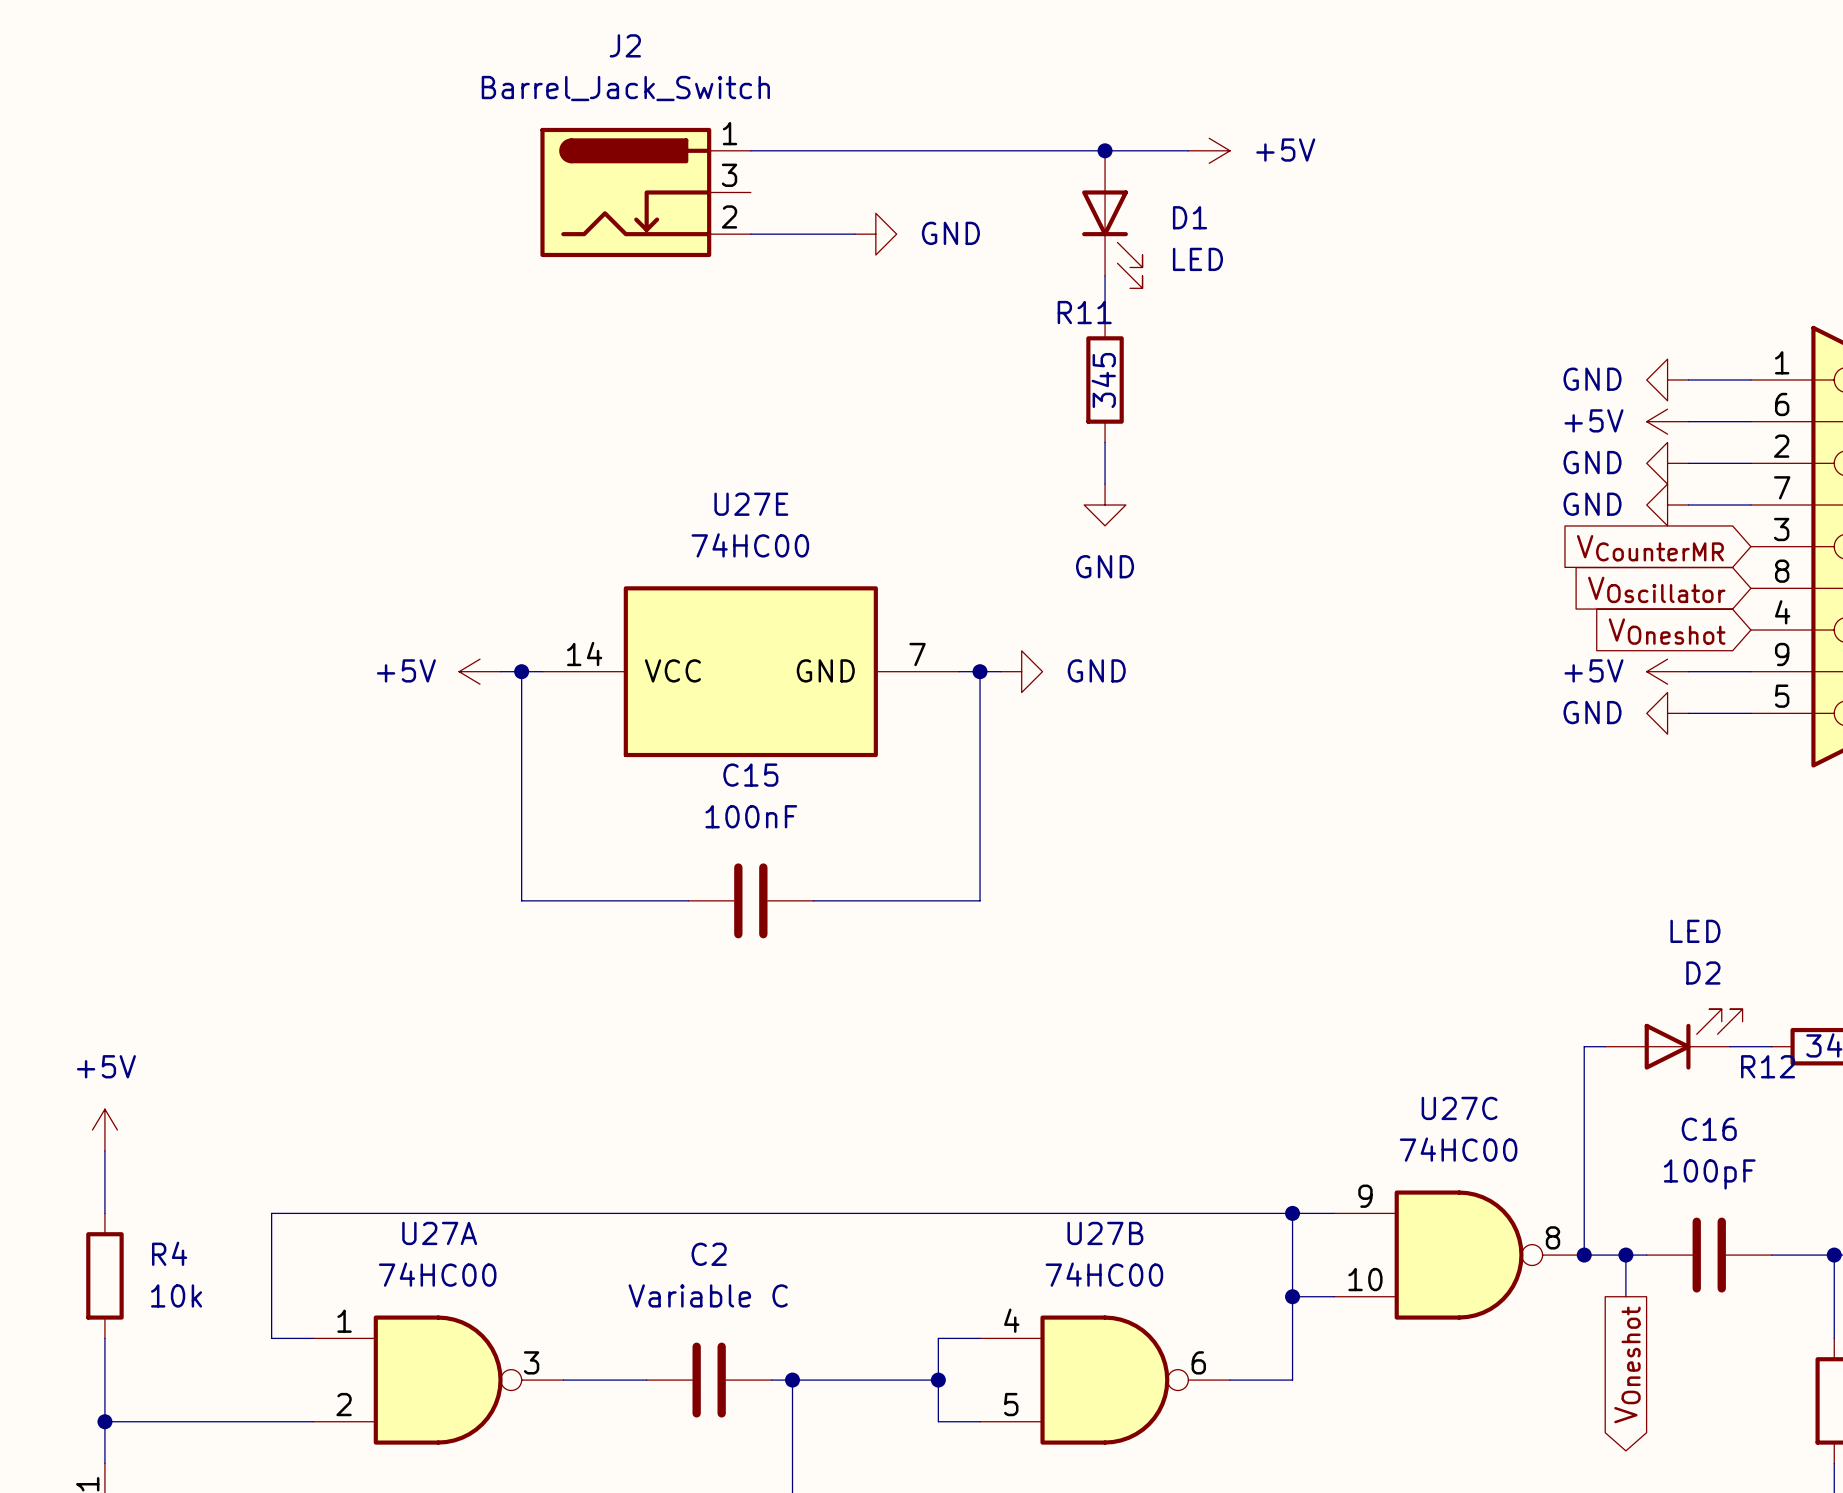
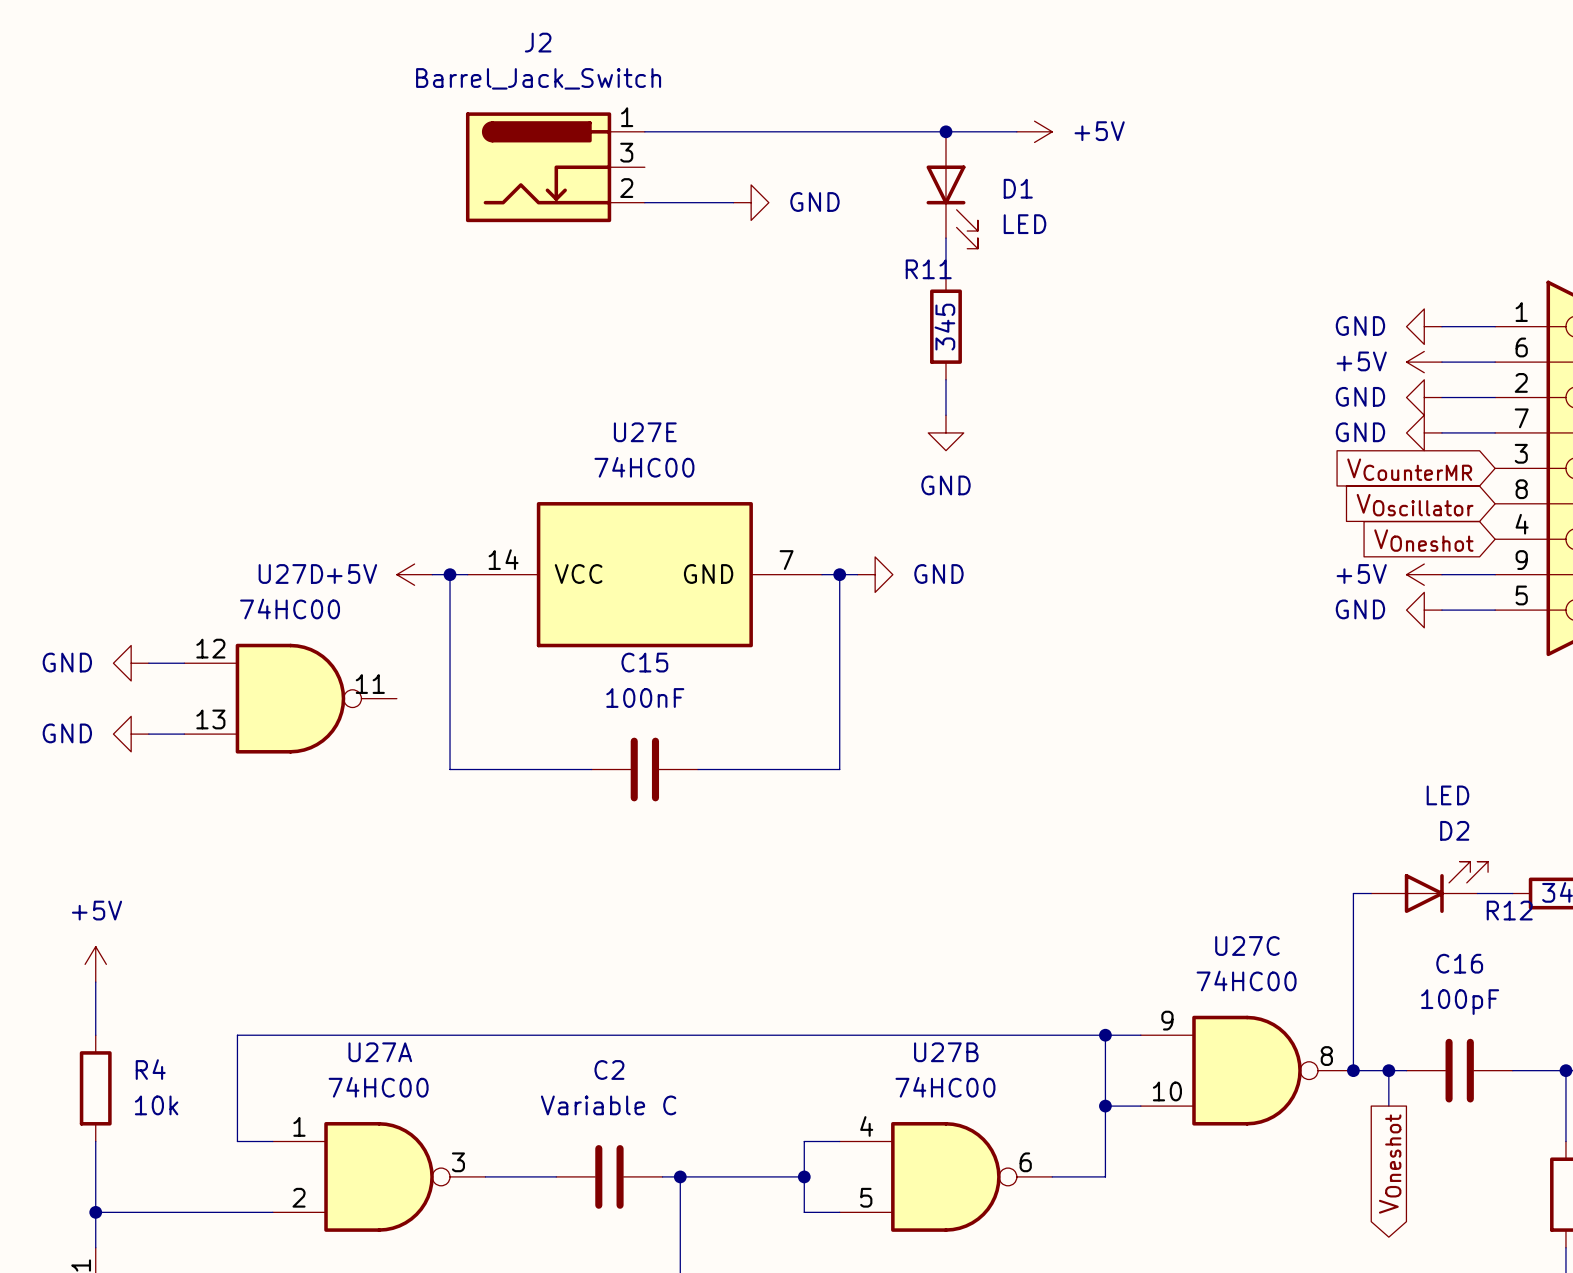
power symbol: none -> GND (131, 663)
wire: none -> (148, 663) (184, 663)
U27D: none -> 74HC00 (290, 698)
power symbol: none -> GND (131, 734)
wire: none -> (148, 734) (184, 734)

